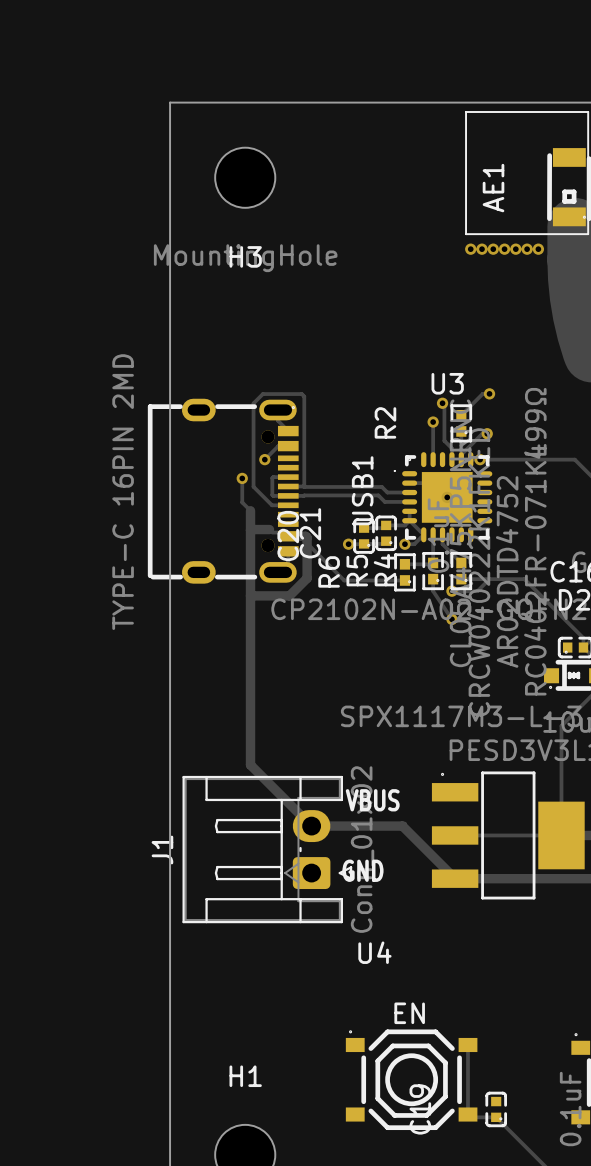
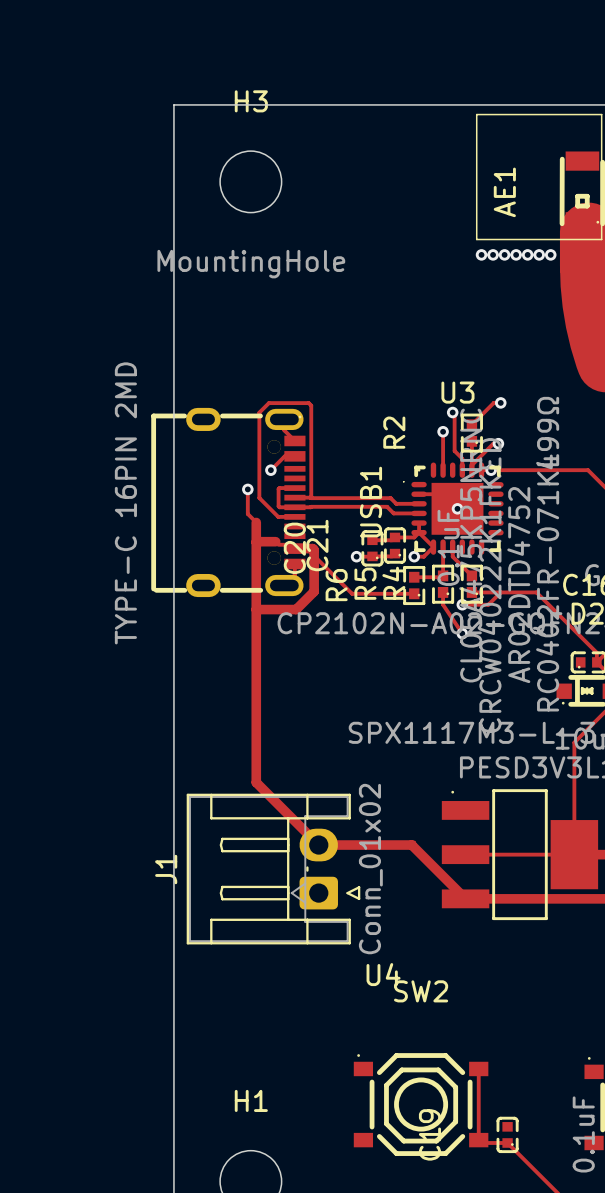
H3 name position: H3 (245, 256) -> H3 (251, 101)
text: VBUS (372, 800) -> none
text: GND (362, 870) -> none
EN name: EN (409, 1013) -> SW2 (421, 991)

